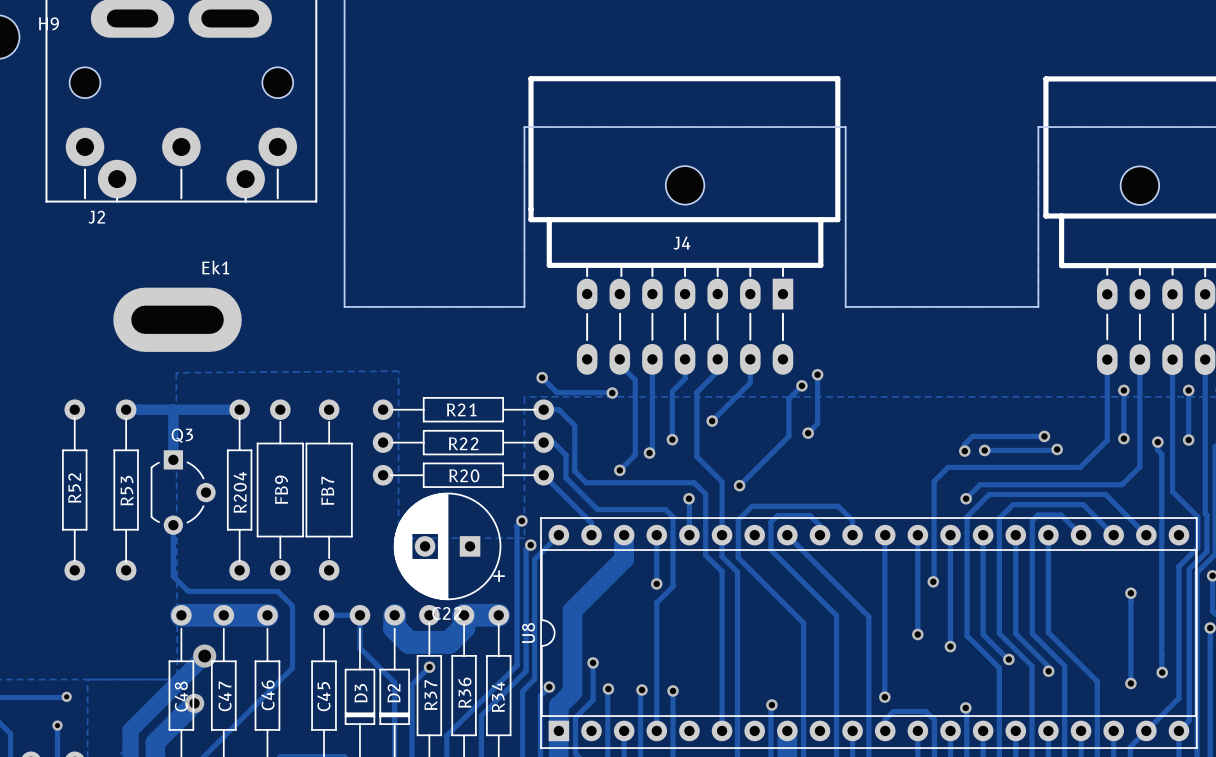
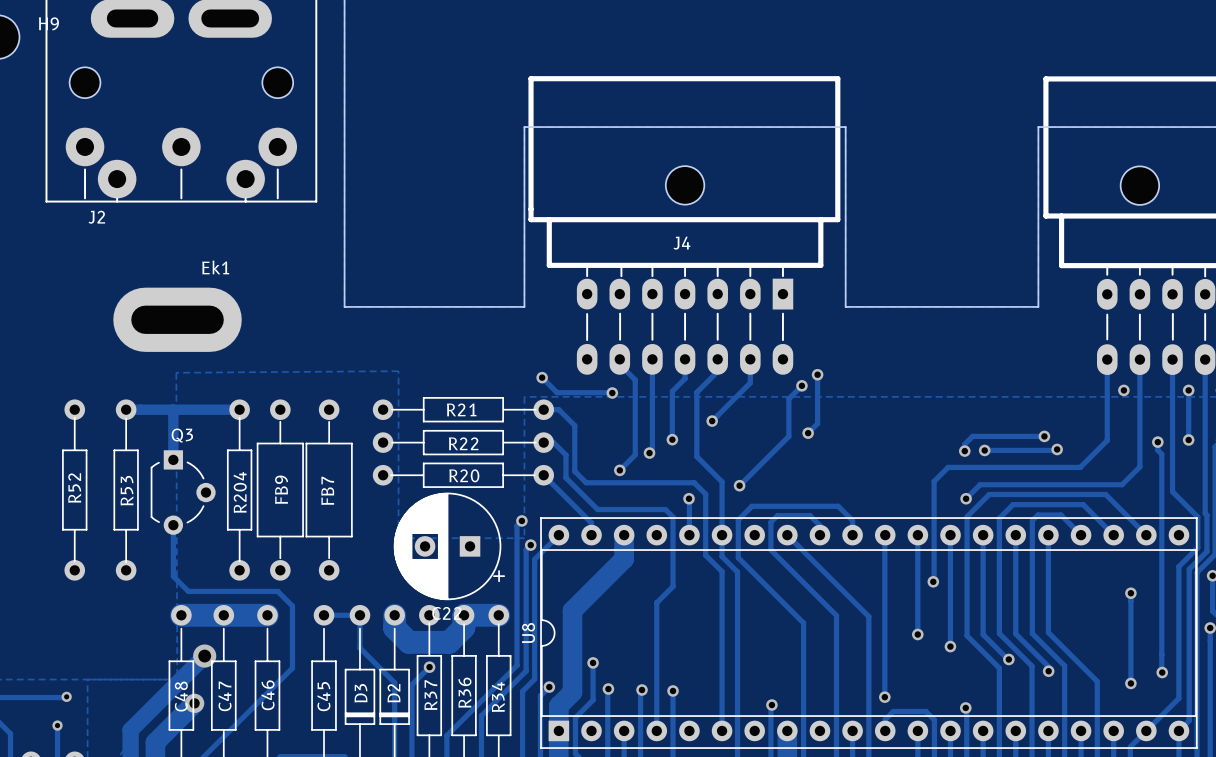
track: (1123, 390) (1123, 438) -> none
via: (1123, 438) -> none
track: (656, 535) (656, 583) -> none
via: (656, 583) -> none

